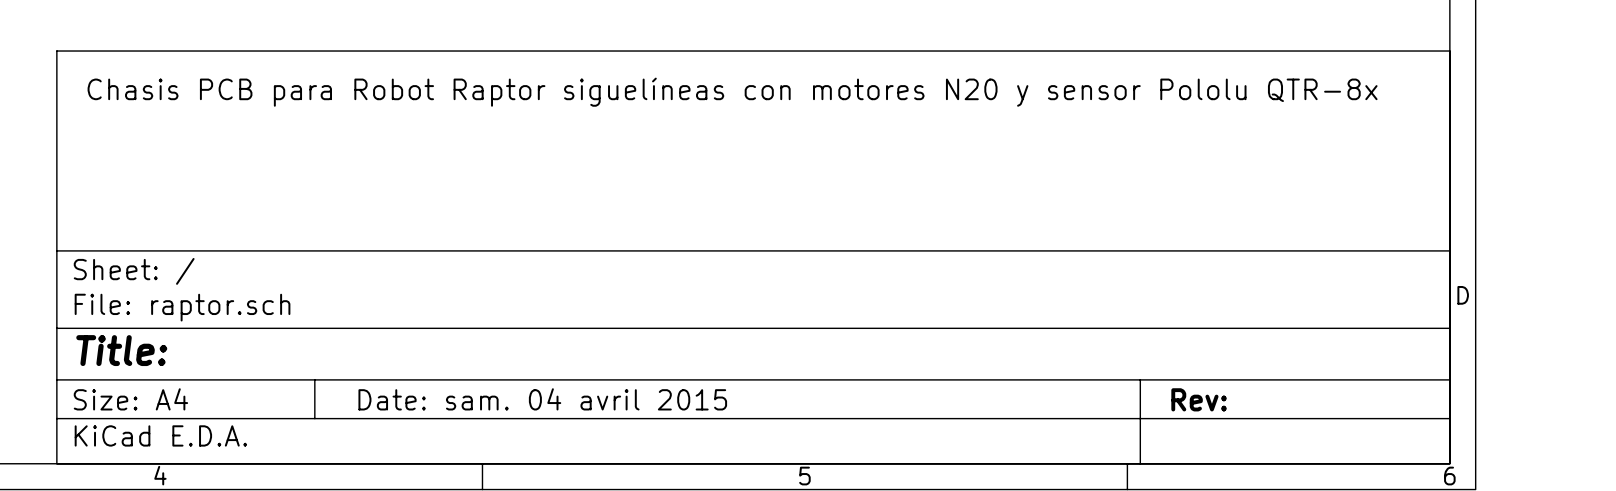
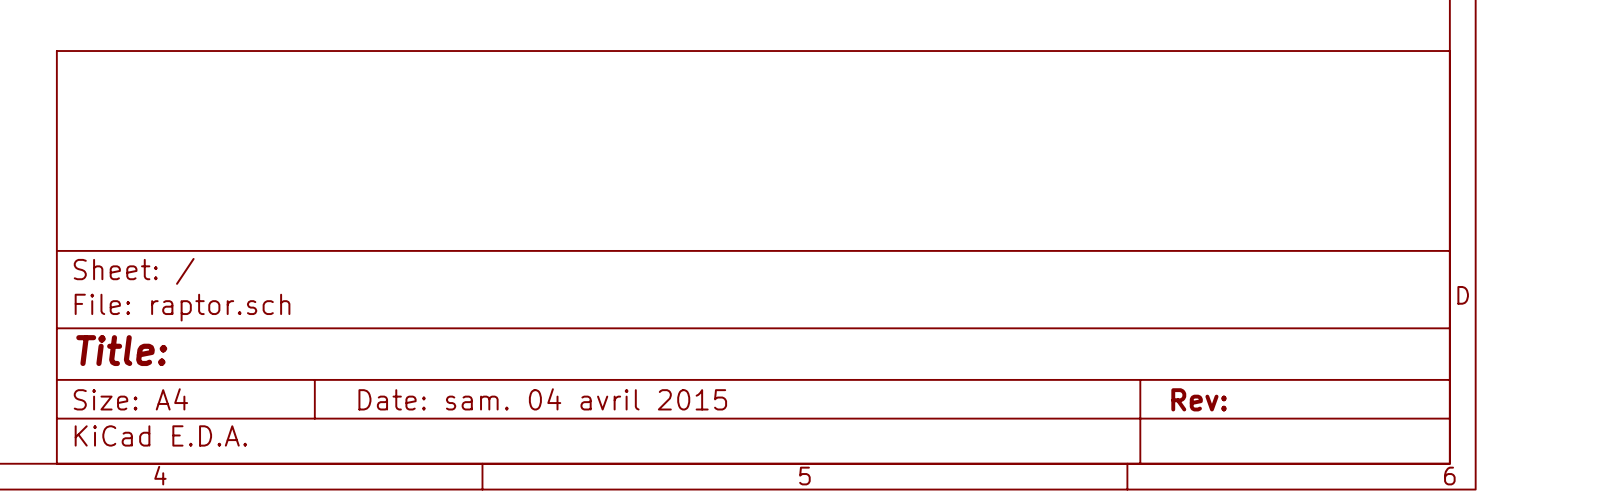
text: Chasis PCB para Robot Raptor siguelíneas con motores N20 y sensor Pololu QTR-8x (732, 92) -> none

